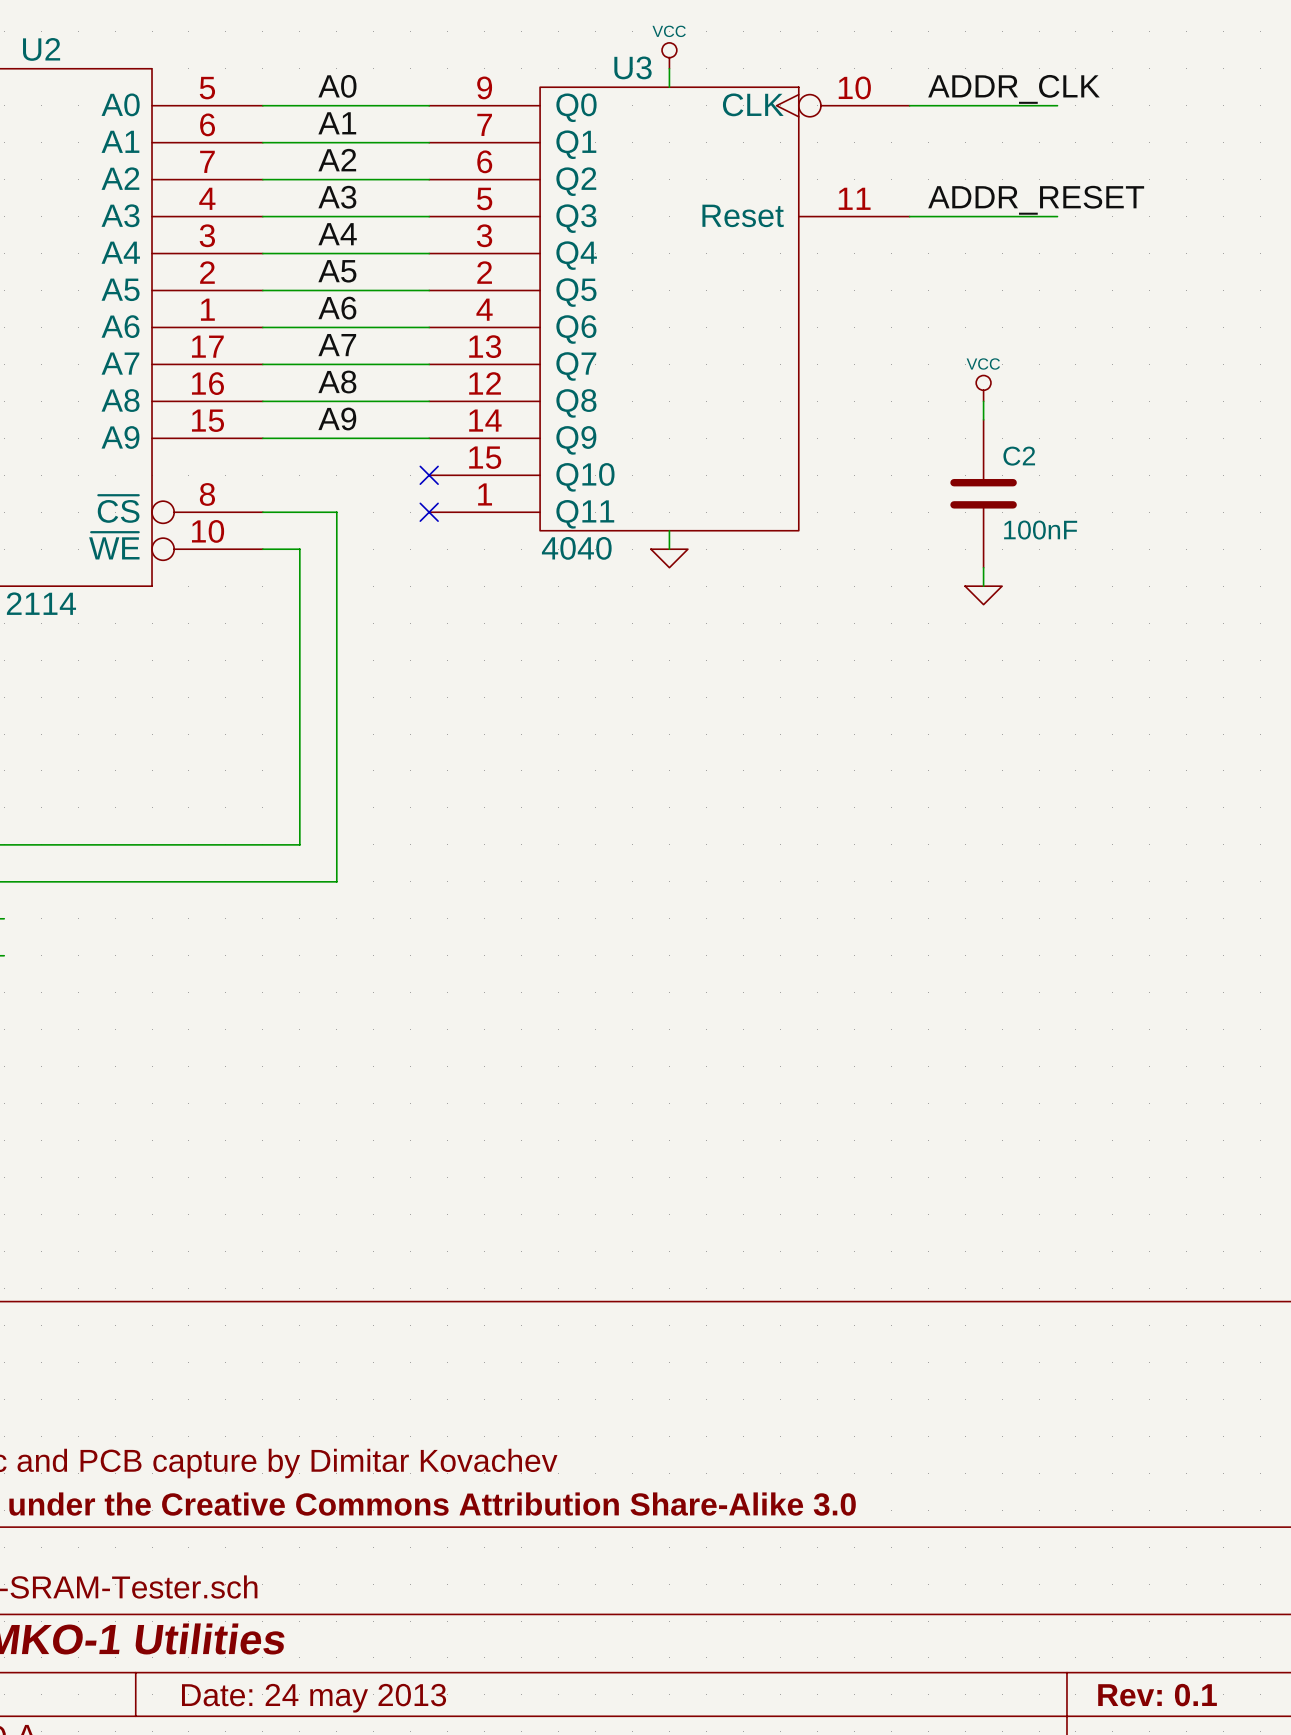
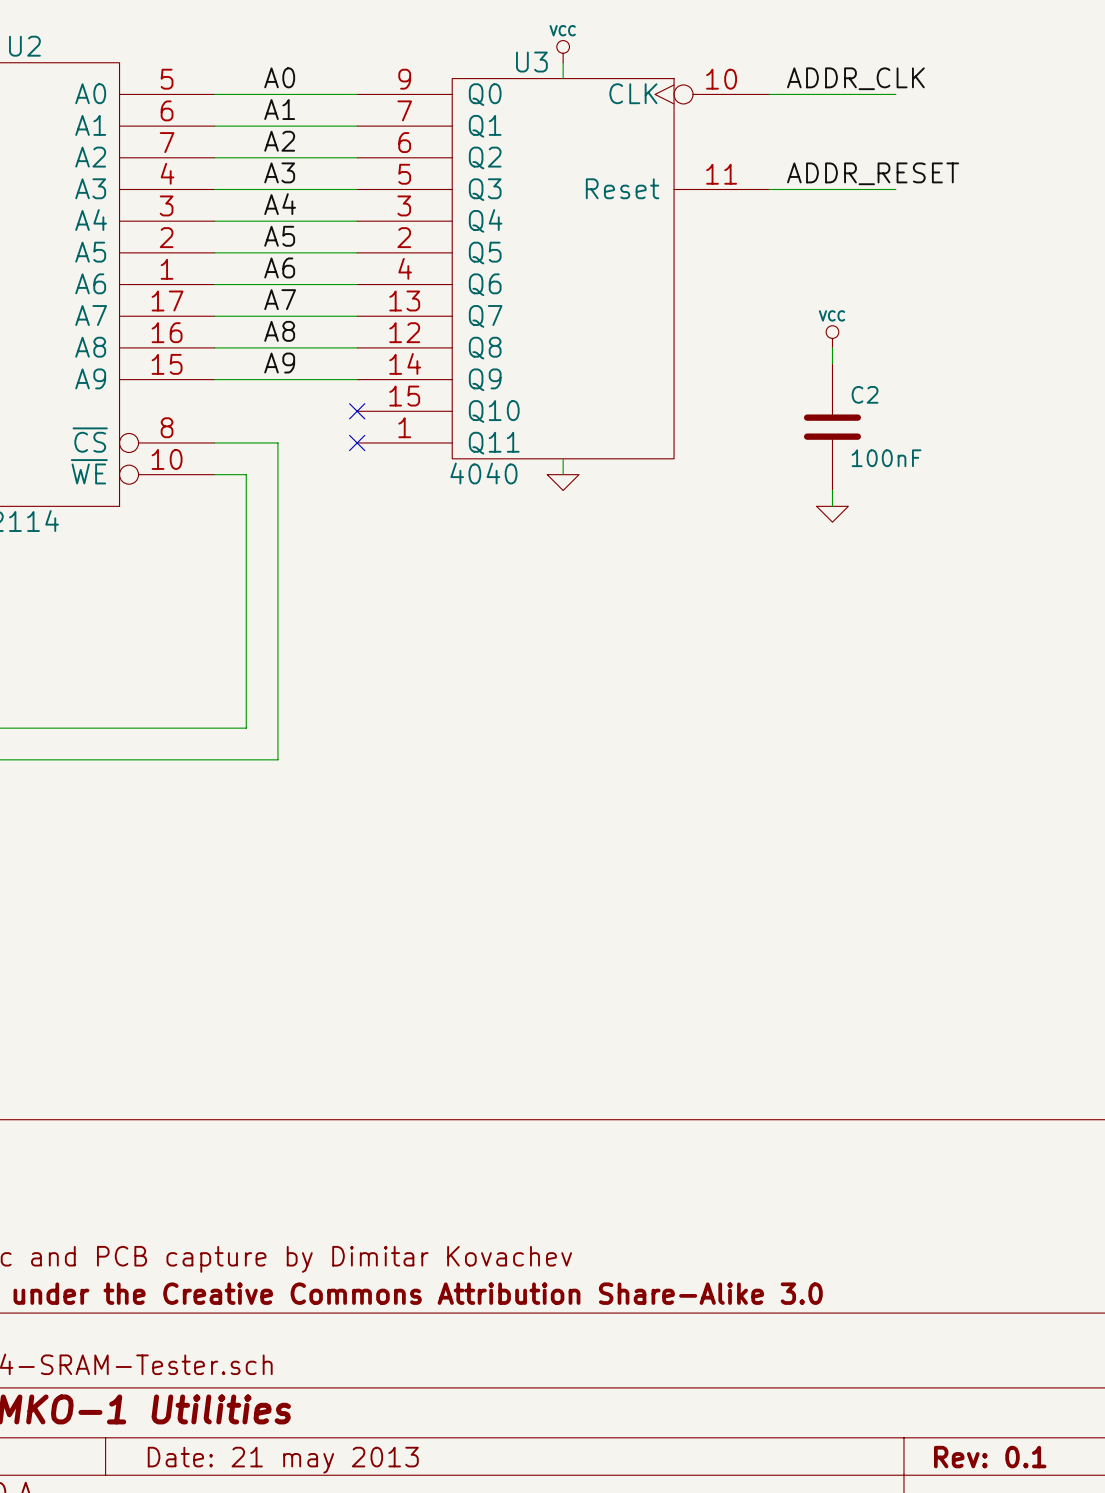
title block: Date: 24 may 2013 (314, 1698) -> Date: 21 may 2013 (283, 1460)

